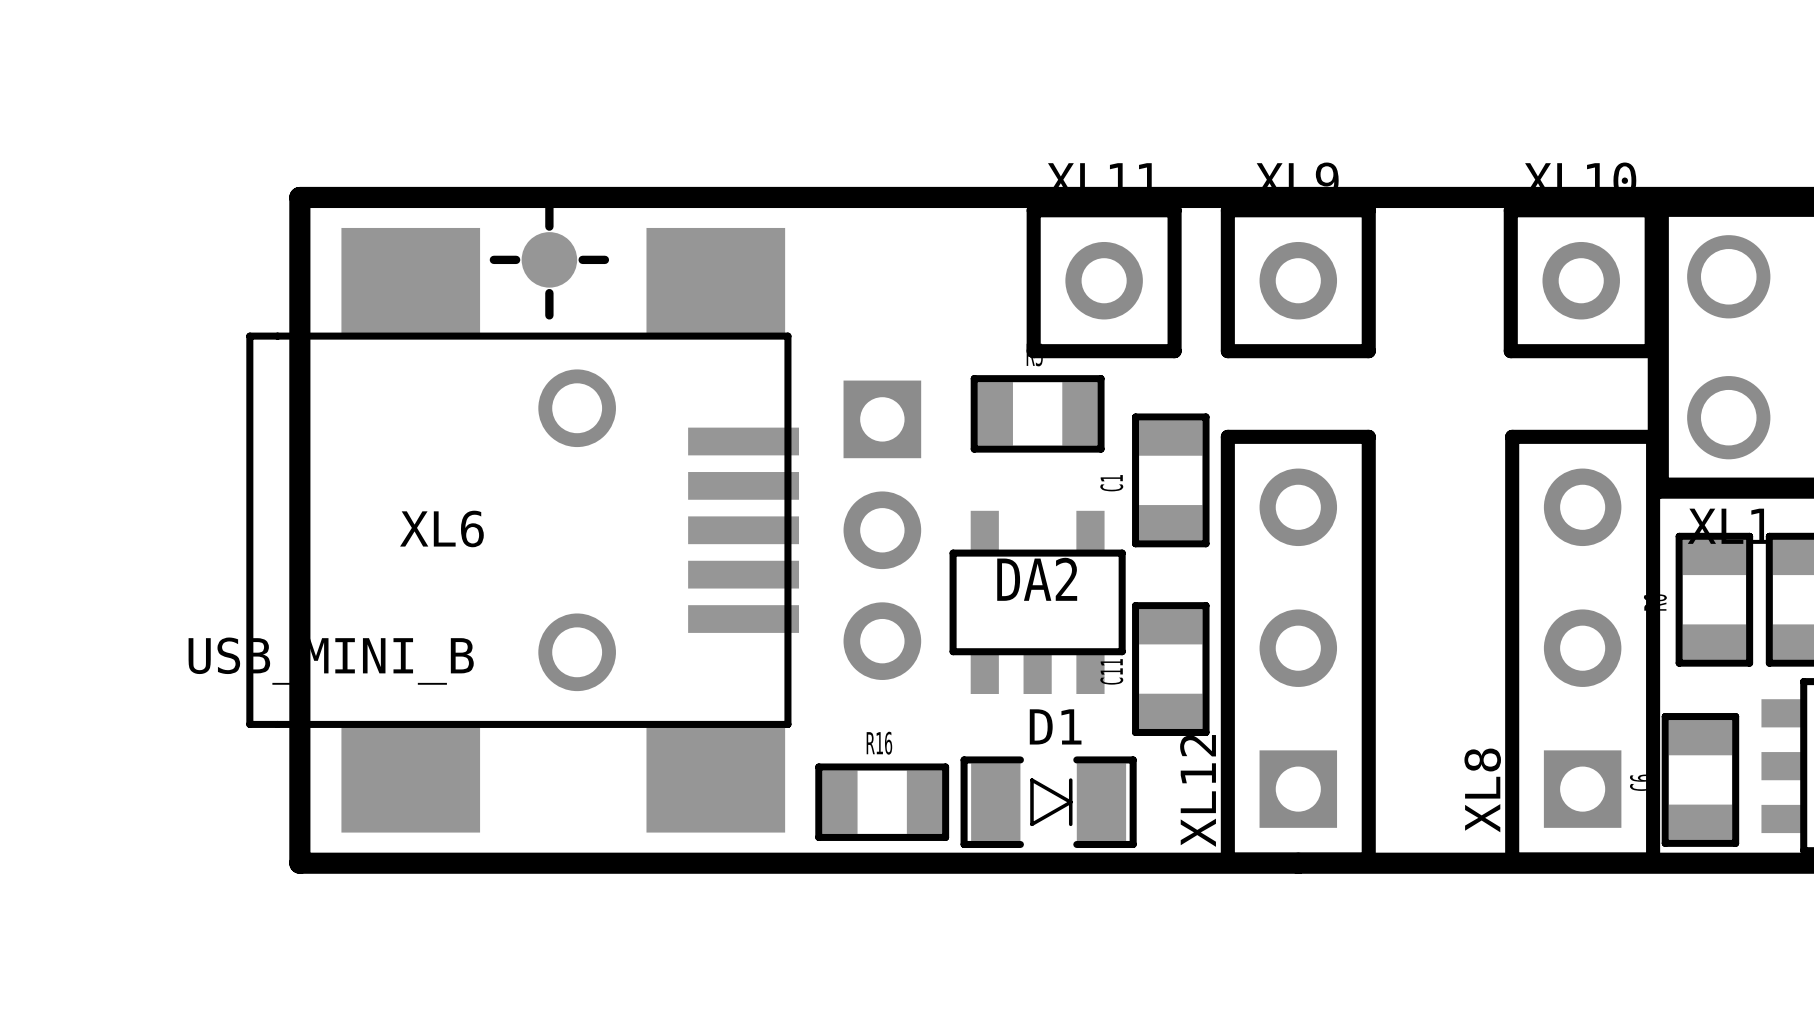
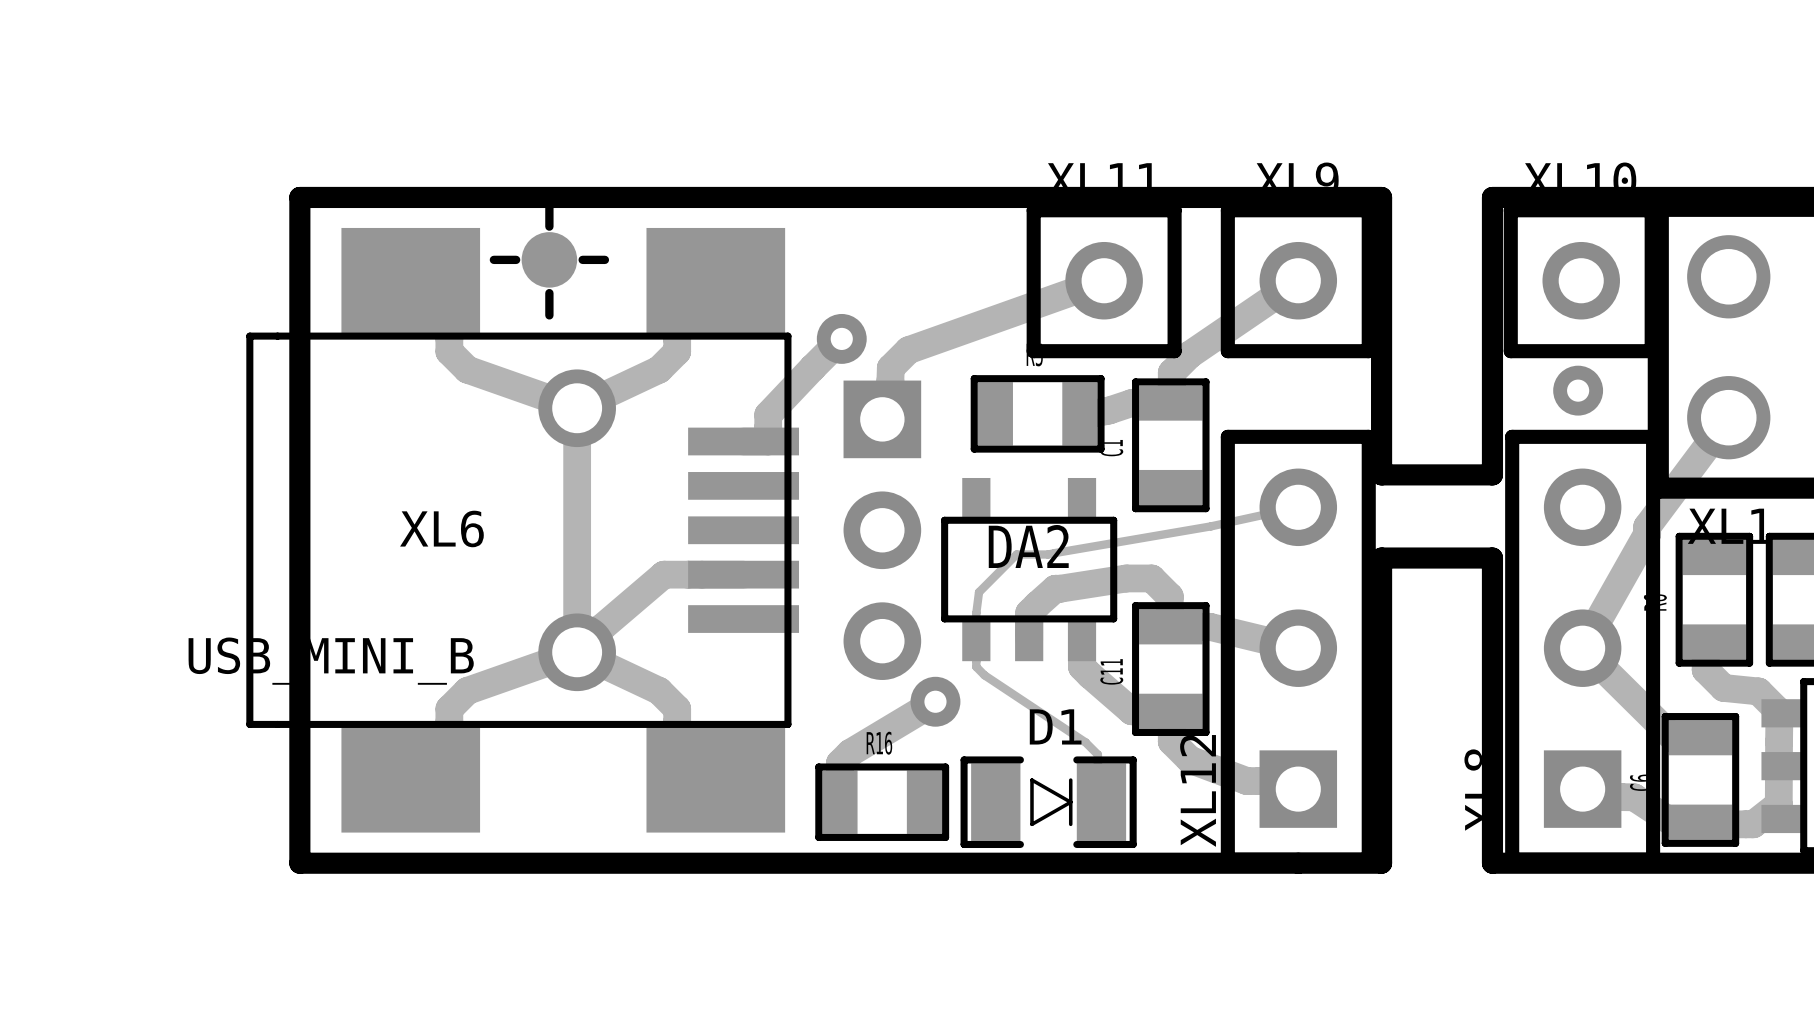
board edge: (1381, 197) (1492, 197) -> (1381, 197) (1381, 474) (1492, 474) (1492, 197)
track: none -> (1104, 280) (908, 350) (890, 367) (890, 394) (882, 419)
track: none -> (1298, 280) (1189, 354) (1171, 372) (1170, 403) (1131, 403) (1109, 410) (1079, 413)
track: none -> (410, 283) (449, 324) (449, 351) (467, 369) (577, 408)
track: none -> (715, 283) (677, 324) (677, 351) (659, 369) (577, 408)
track: none -> (841, 338) (768, 414) (768, 441) (743, 441)
via: none -> (841, 338)
via: none -> (1578, 390)
track: none -> (577, 408) (577, 652)
track: none -> (1728, 417) (1647, 526) (1647, 534) (1582, 648) (1675, 739) (1714, 739)
C1 position: (1170, 480) -> (1170, 445)
track: none -> (1298, 507) (1211, 526) (1048, 554) (1016, 554) (979, 592) (976, 612) (976, 666) (984, 675) (1085, 742) (1097, 754) (1101, 802)
track: none -> (743, 574) (663, 574) (601, 627) (577, 652)
DA2 position: (1037, 602) -> (1029, 569)
track: none -> (1704, 639) (1705, 669) (1723, 687) (1758, 691) (1776, 709) (1779, 720) (1778, 804) (1753, 824) (1675, 824) (1634, 797) (1607, 797) (1582, 789)
track: none -> (1029, 640) (1029, 612) (1055, 588) (1126, 578) (1151, 578) (1169, 596) (1170, 626) (1209, 626) (1298, 648)
track: none -> (1082, 640) (1082, 666) (1131, 711) (1170, 711) (1171, 741) (1189, 759) (1246, 781) (1273, 781) (1298, 789)
track: none -> (577, 652) (659, 690) (677, 708) (677, 735) (715, 777)
track: none -> (577, 652) (467, 690) (449, 708) (449, 735) (410, 777)
track: none -> (935, 701) (850, 752) (839, 763) (839, 802)
via: none -> (935, 701)
board edge: (1381, 863) (1492, 863) -> (1381, 863) (1381, 558) (1492, 558) (1492, 863)

